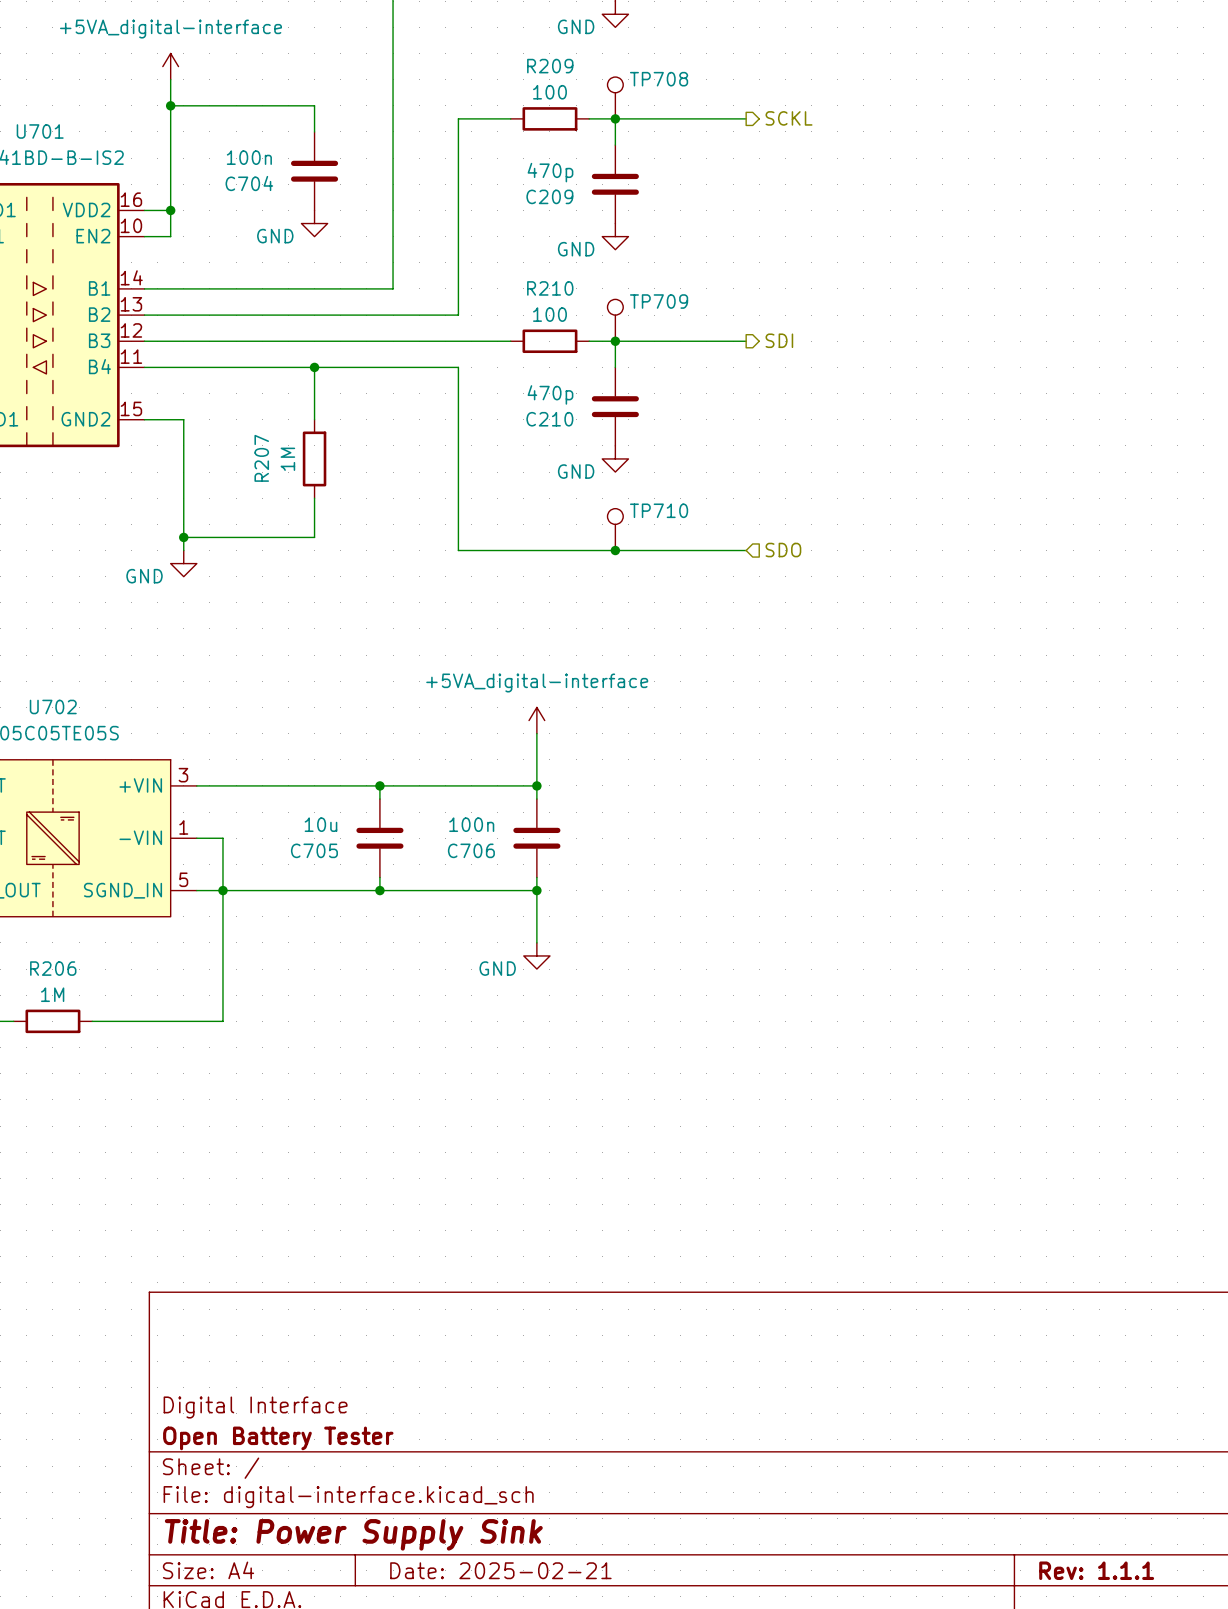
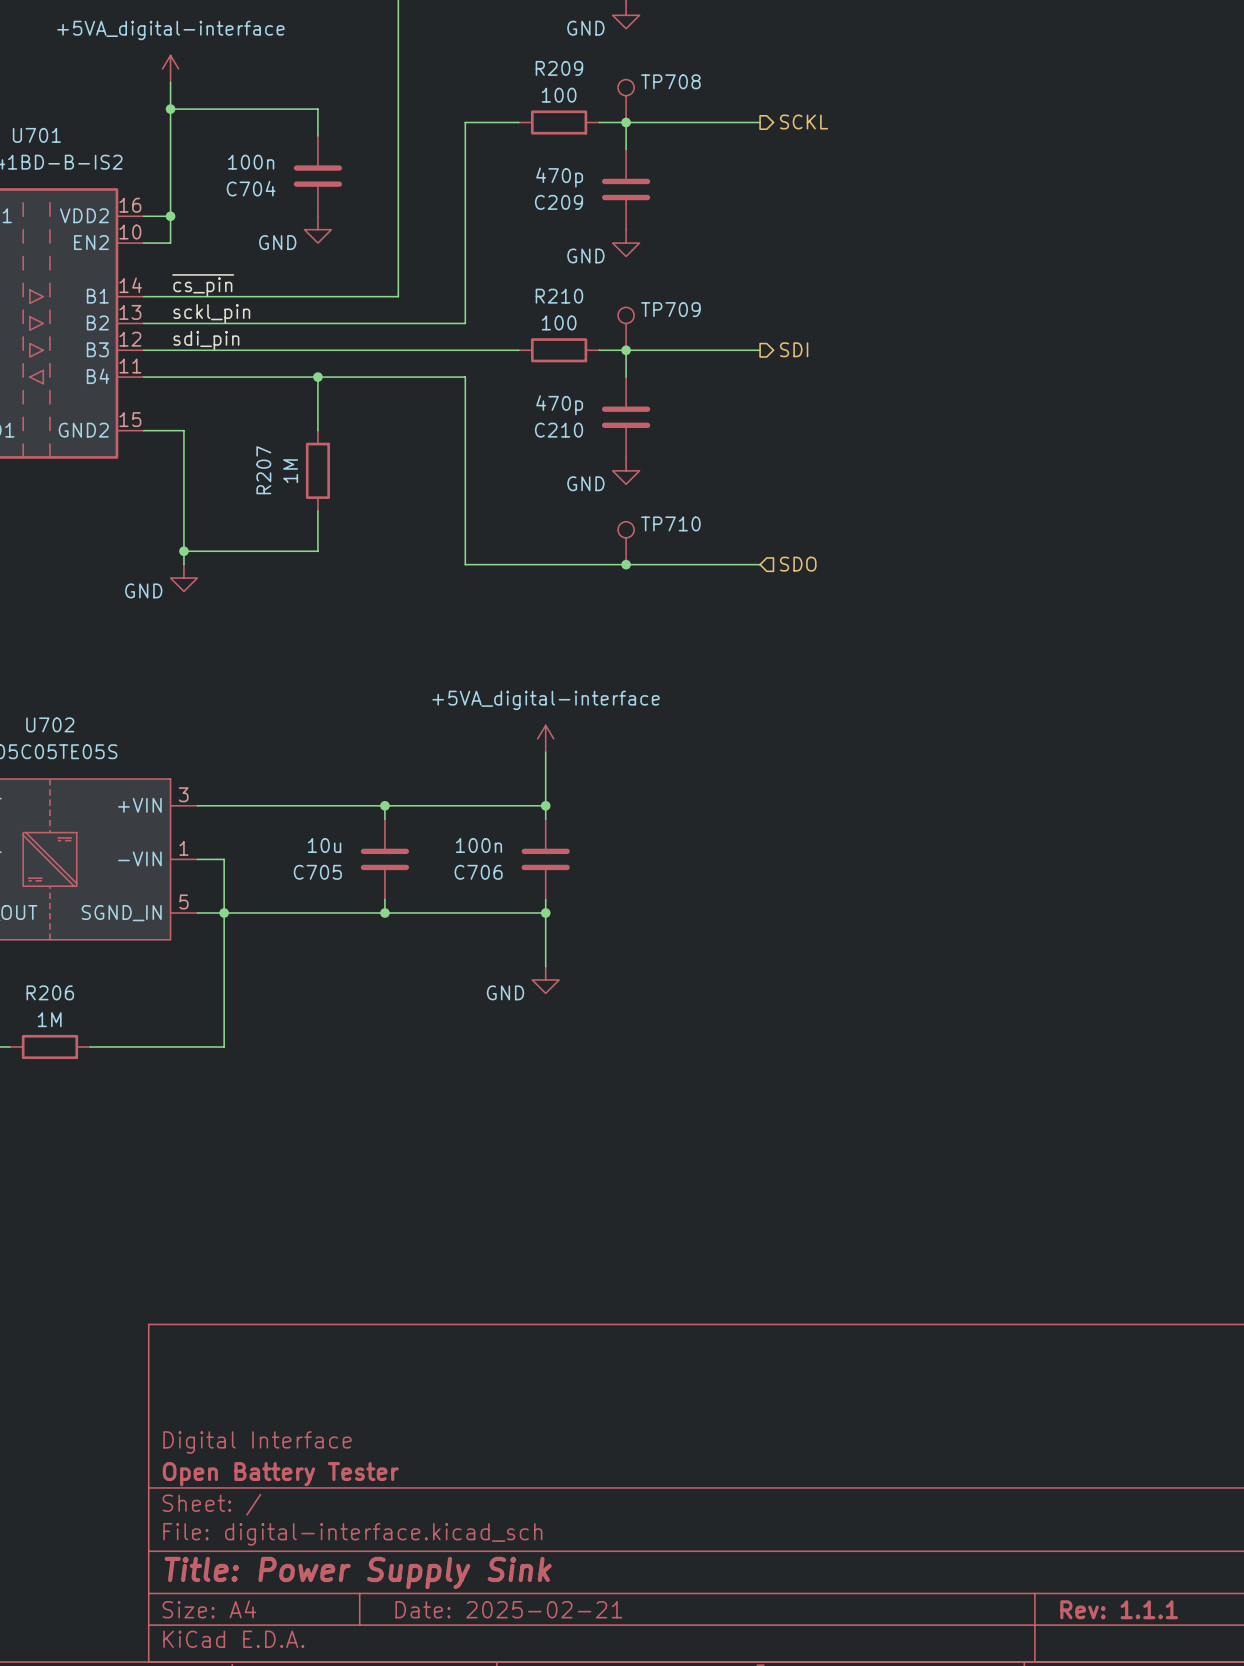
label: none -> ~{cs_pin} (203, 285)
label: none -> sckl_pin (211, 313)
label: none -> sdi_pin (206, 340)

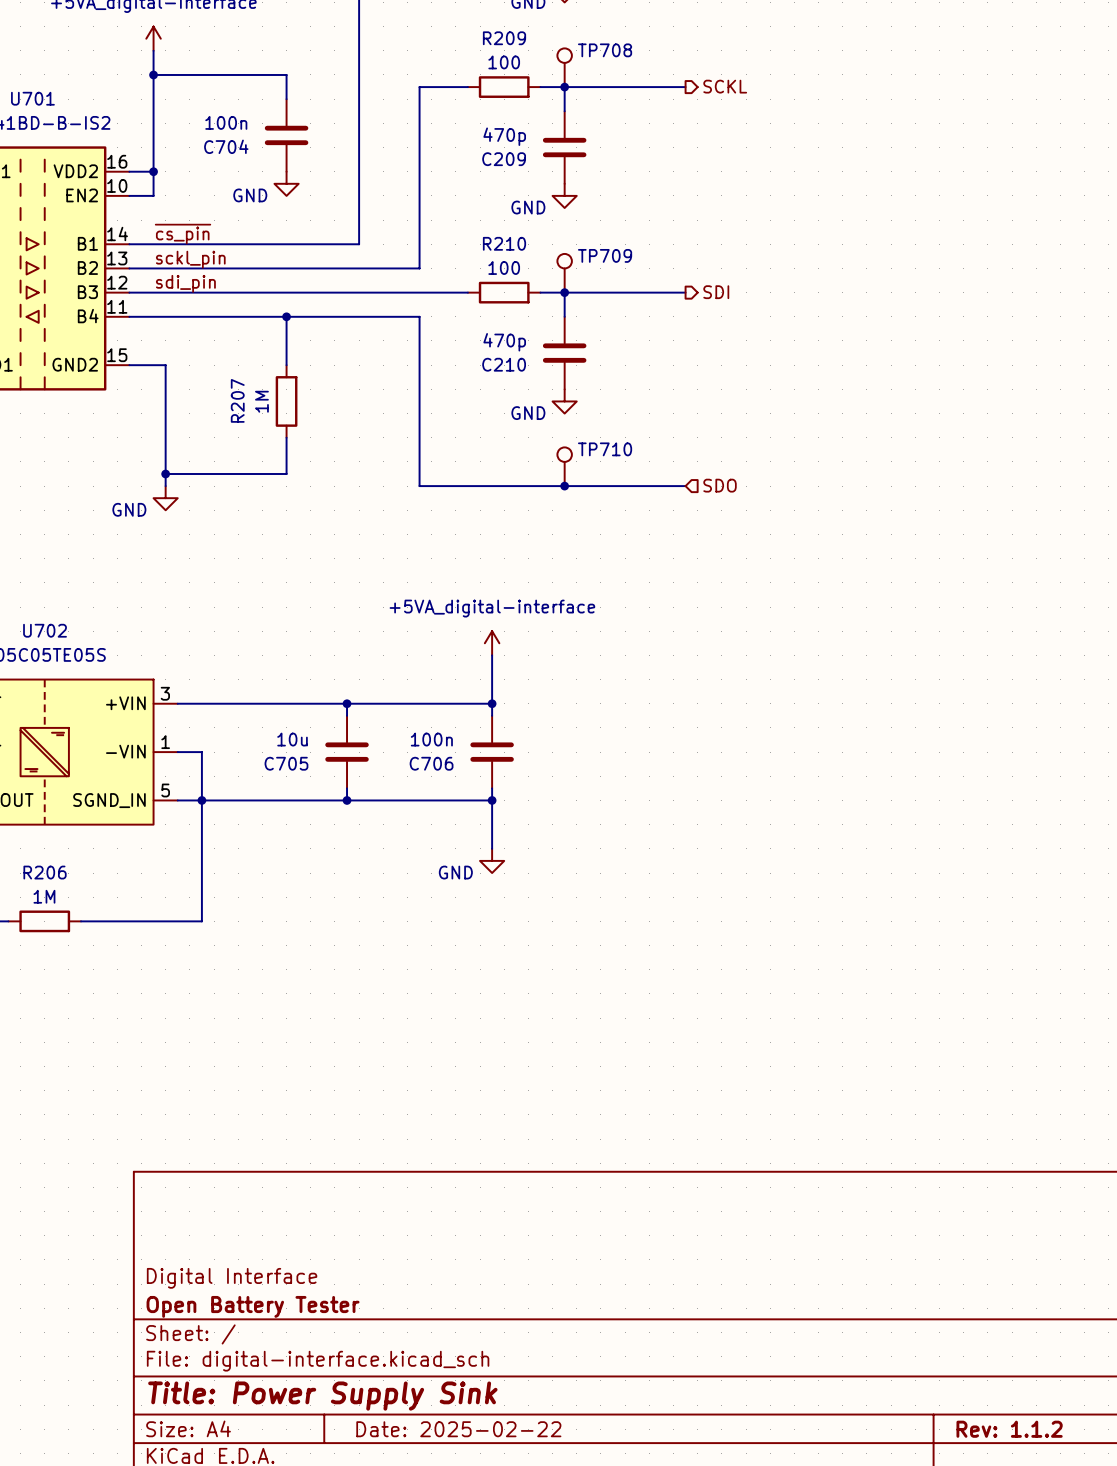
title block: Date: 2025-02-21 (508, 1609) -> Date: 2025-02-22 (458, 1429)
title block: Rev: 1.1.1 (1119, 1609) -> Rev: 1.1.2 (1009, 1429)

